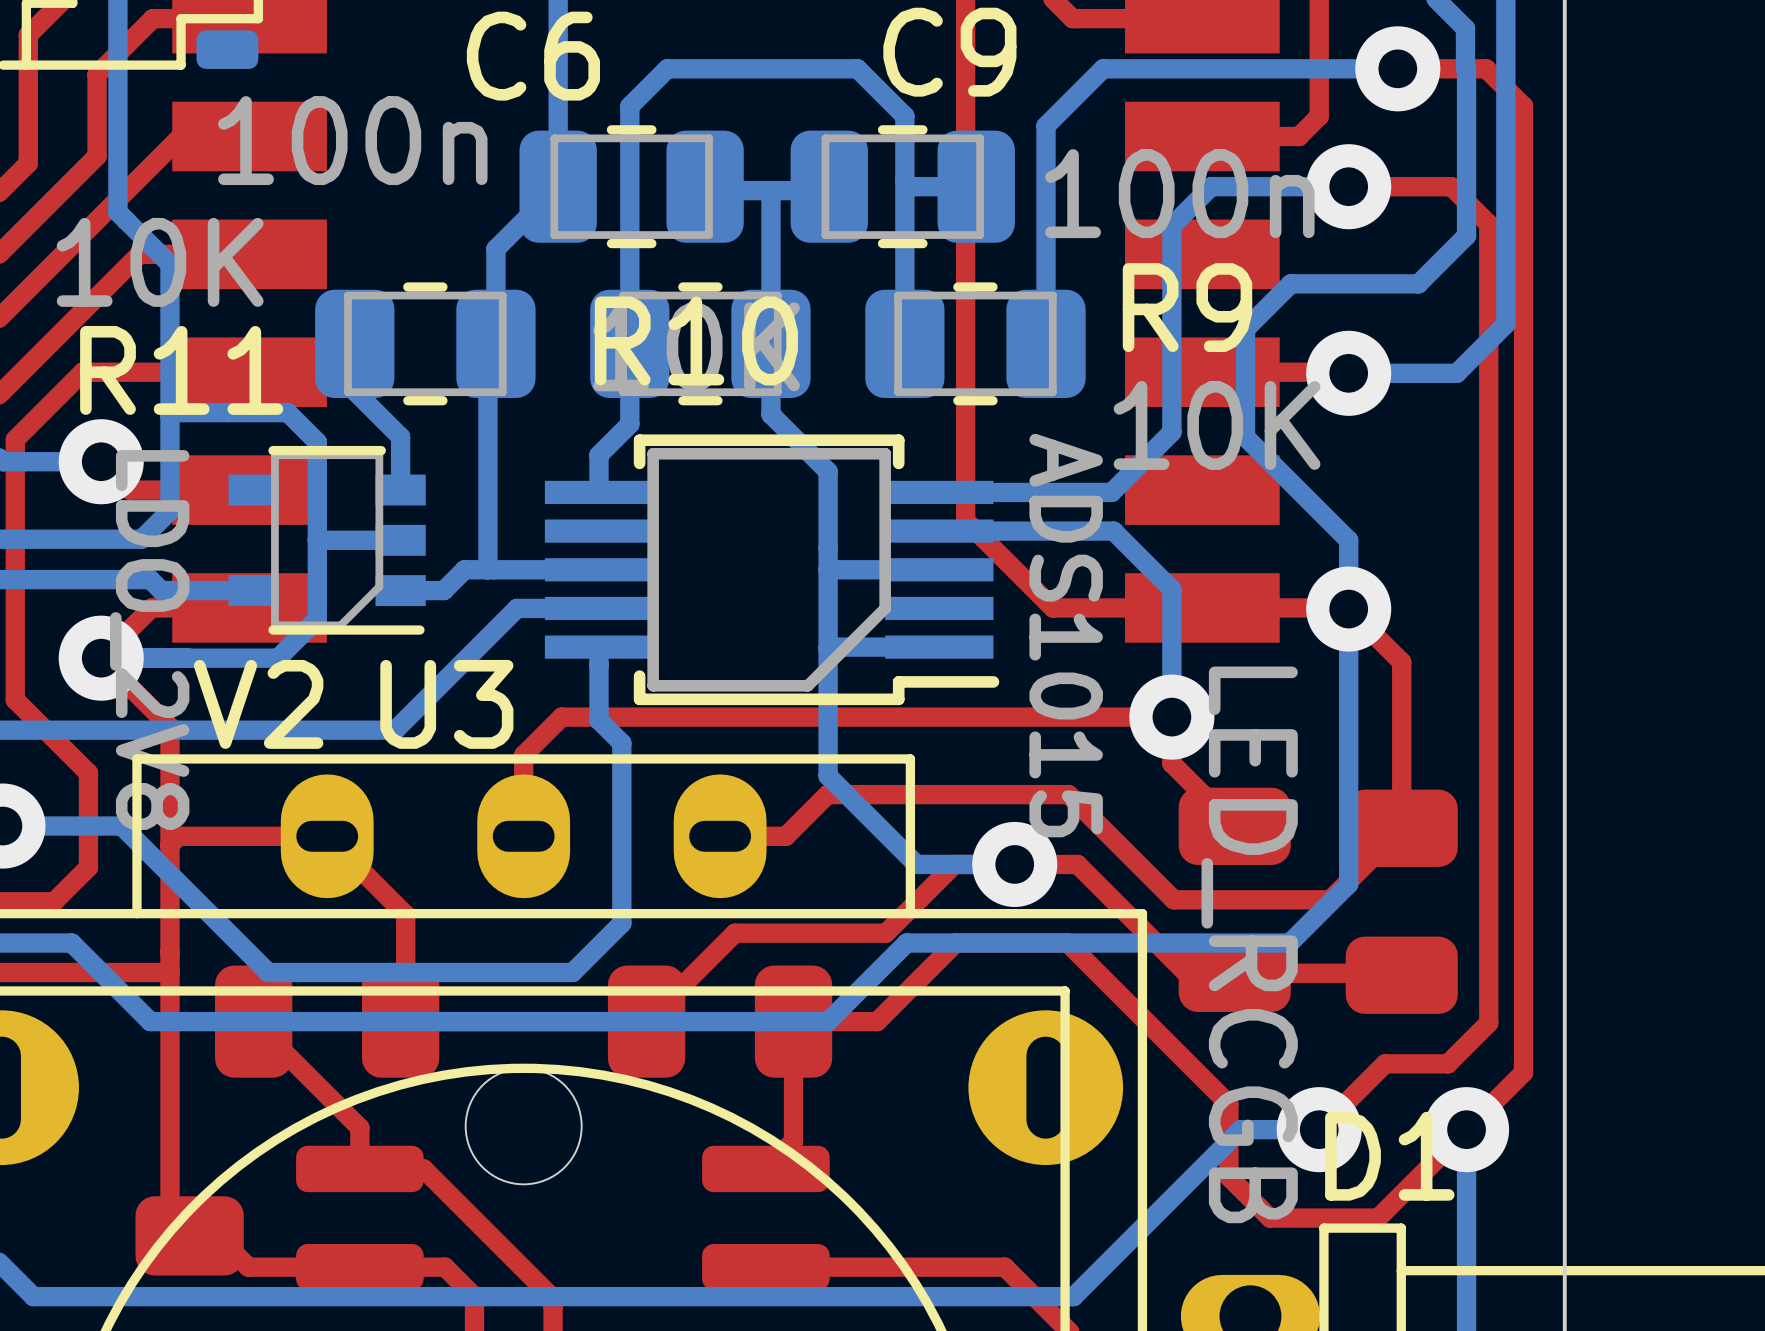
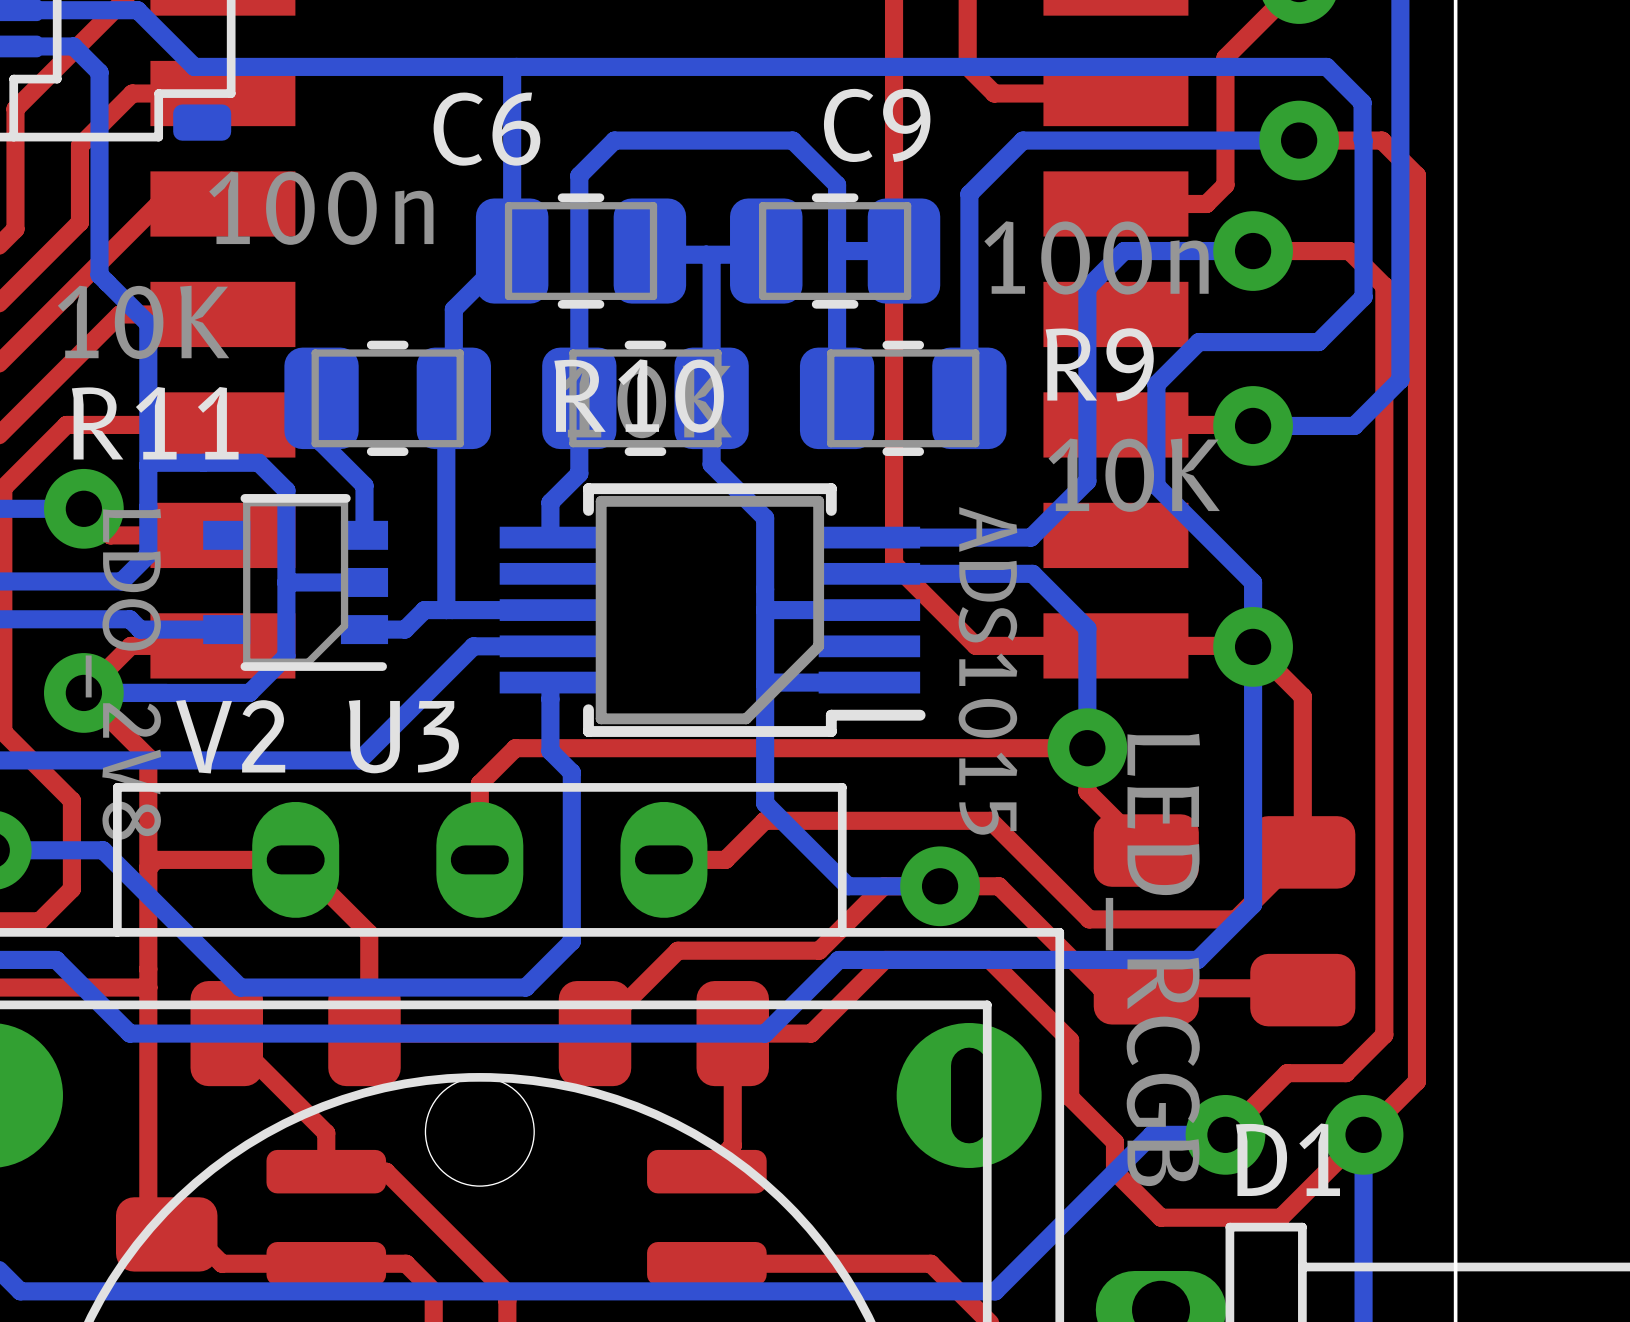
top track: (1153, 1028) (1228, 1104) (1228, 1176) (1270, 1218) -> (1070, 1040) (1070, 1097) (1114, 1142) (1114, 1171) (1161, 1217) (1179, 1217)

